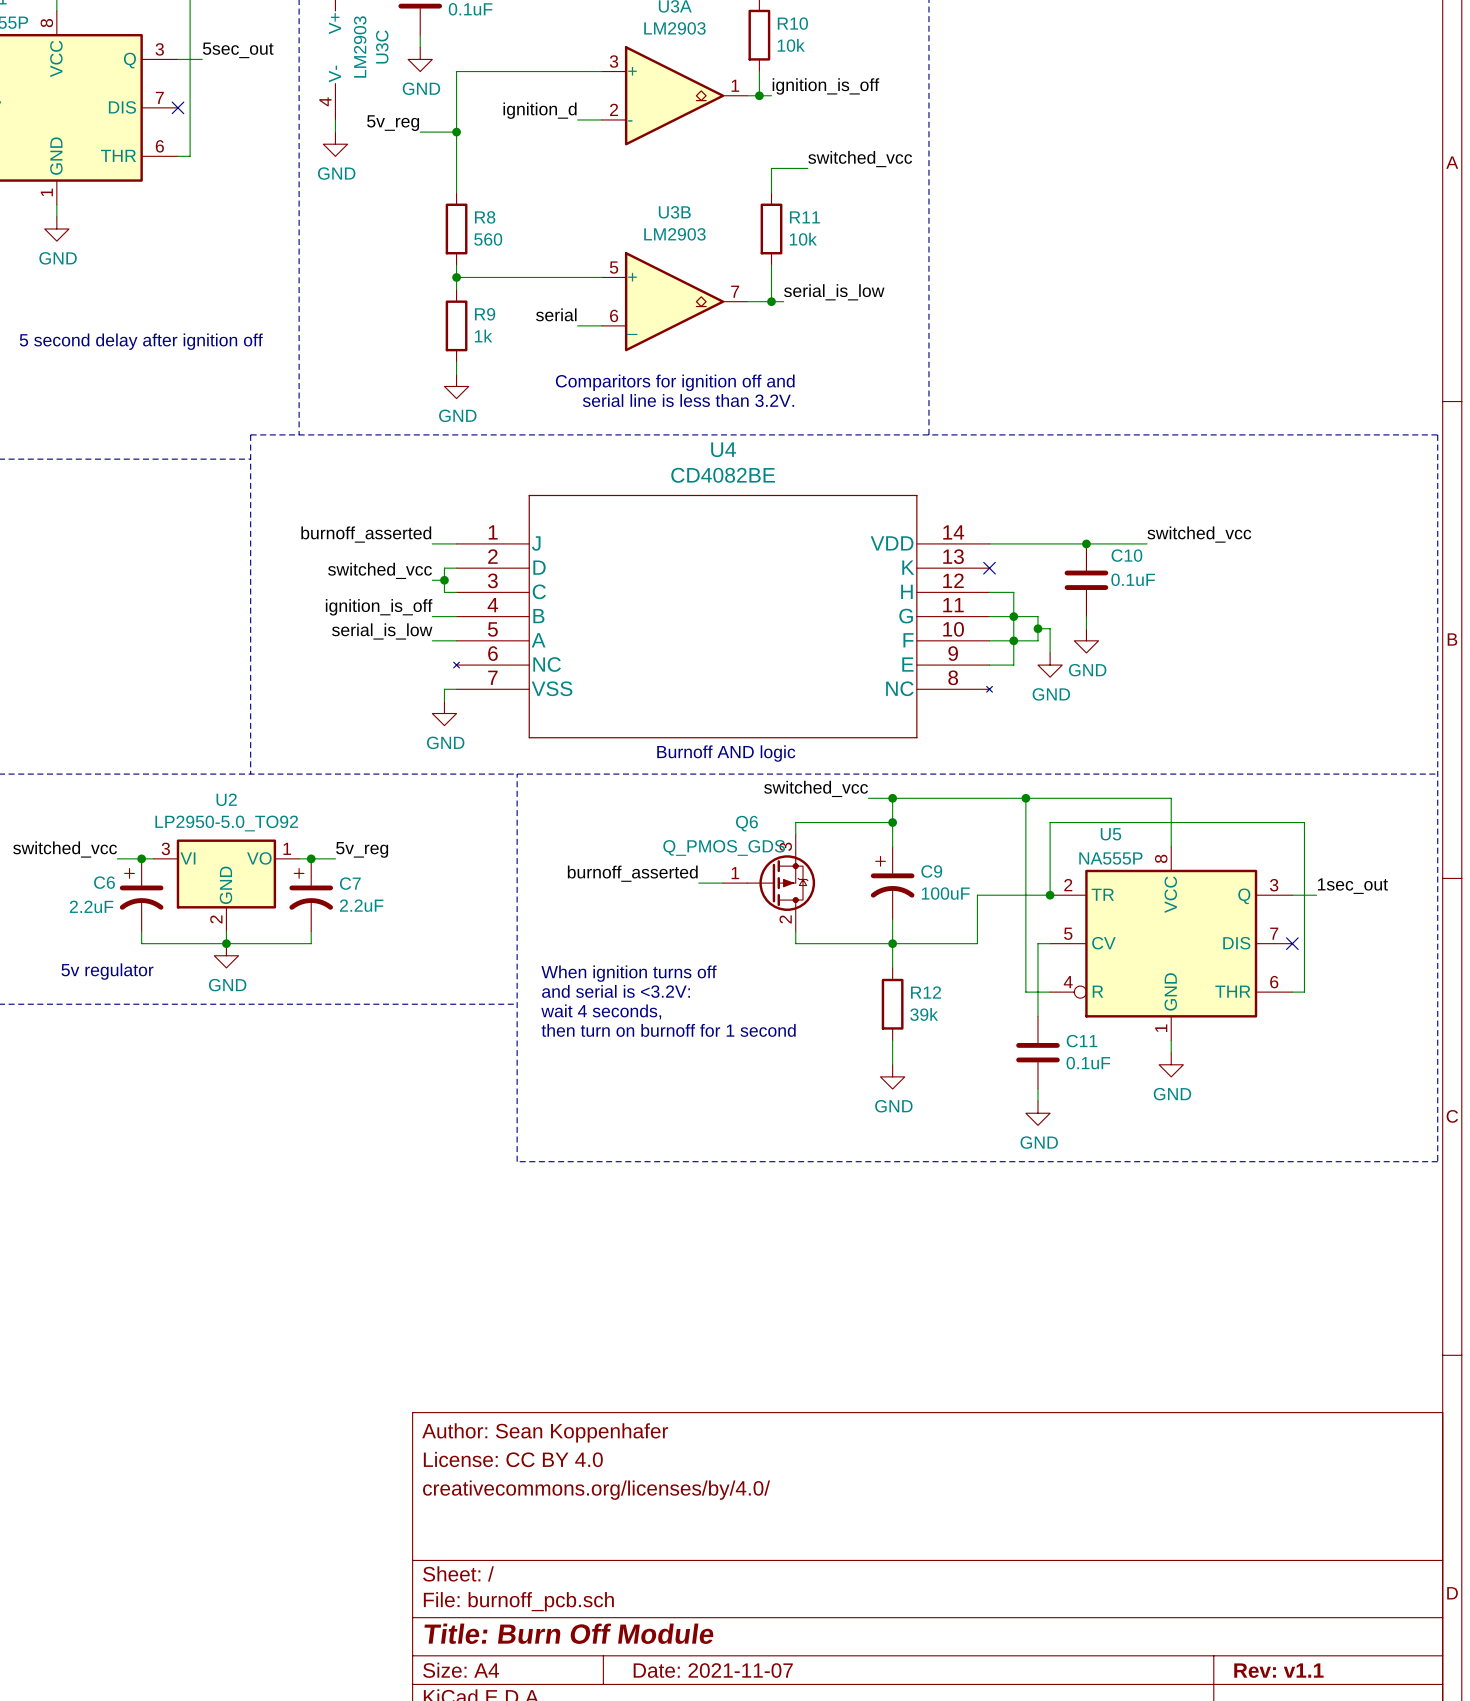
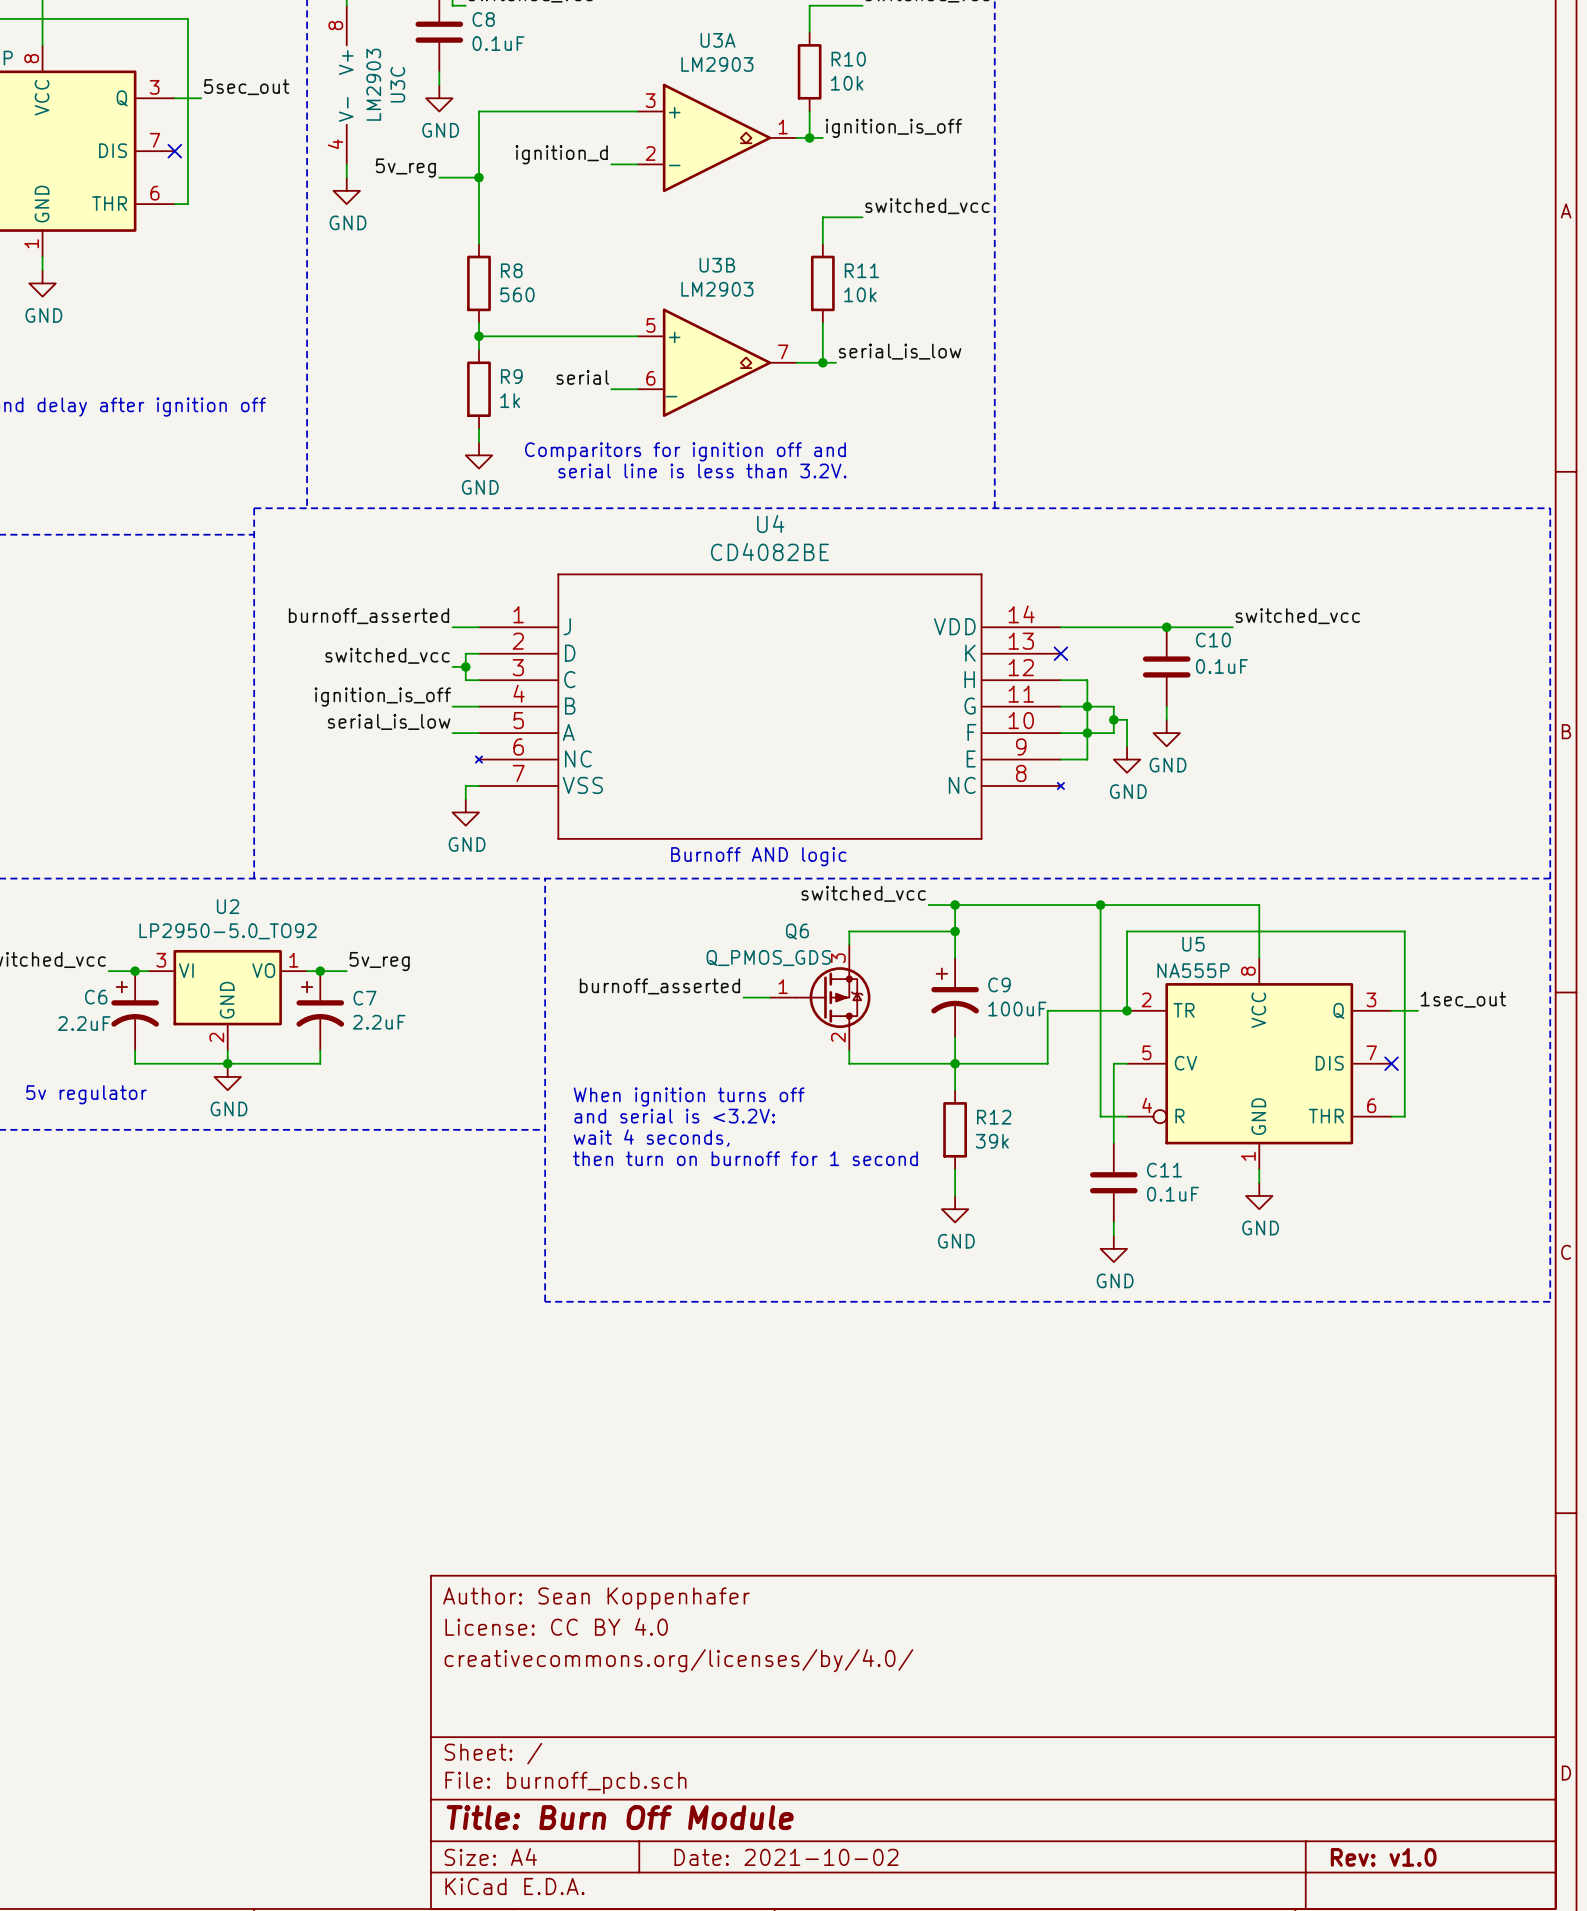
title block: Date: 2021-11-07 (713, 1670) -> Date: 2021-10-02 (786, 1857)
title block: Rev: v1.1 (1278, 1670) -> Rev: v1.0 (1383, 1857)

